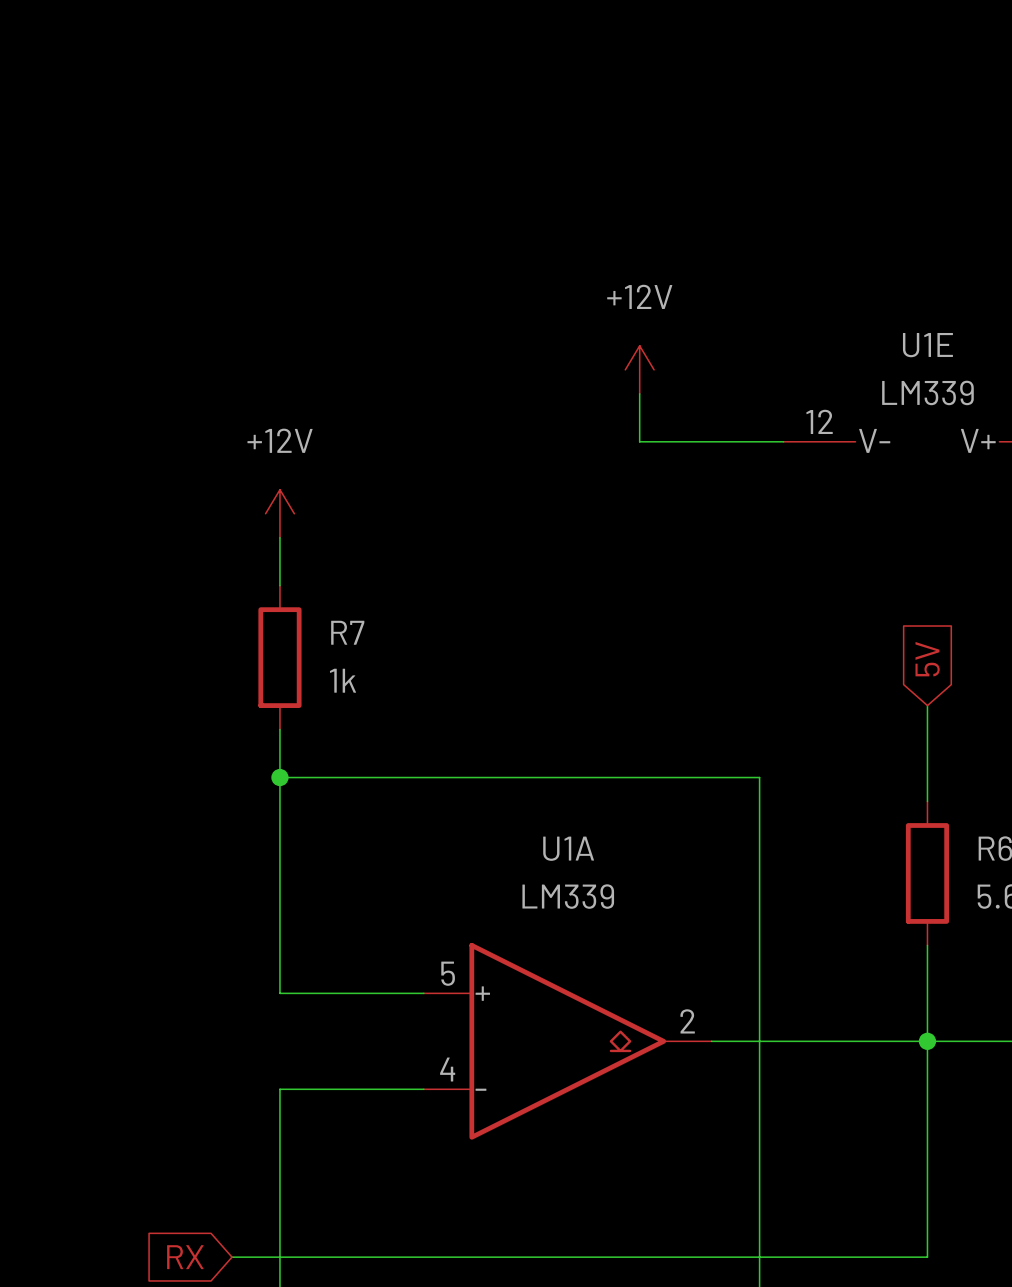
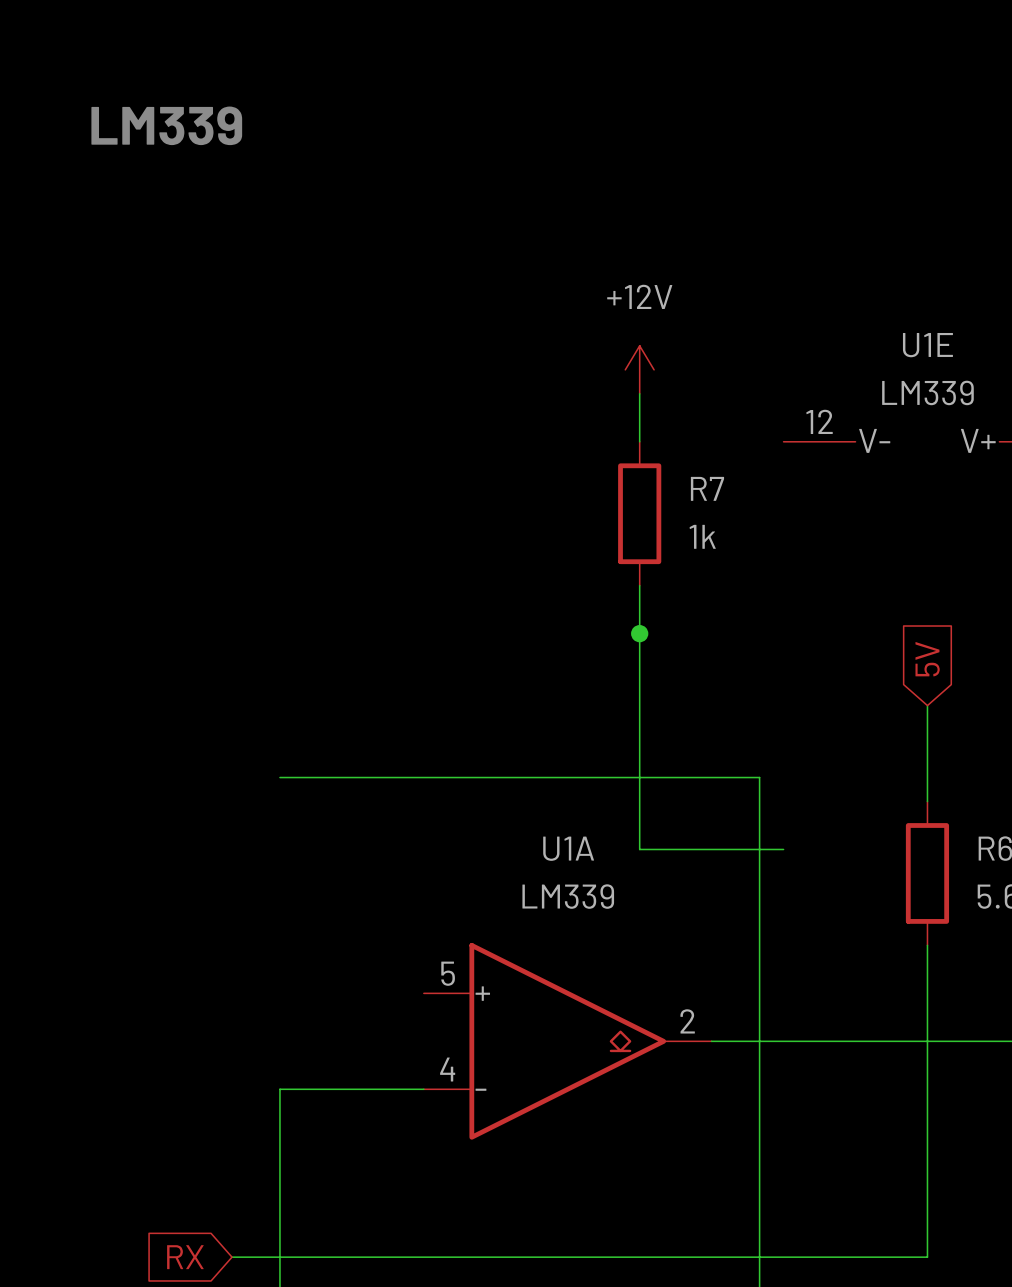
text: none -> LM339 (166, 125)
wire: (639, 441) (783, 441) -> none
power symbol: +12V (279, 513) -> none
wire: (279, 537) (279, 585) -> none
junction: none -> (639, 633)
R7 position: (279, 657) -> (639, 513)
wire: (279, 729) (279, 993) (423, 993) -> (639, 585) (639, 849) (783, 849)
junction: (279, 777) -> none
junction: (927, 1041) -> none

